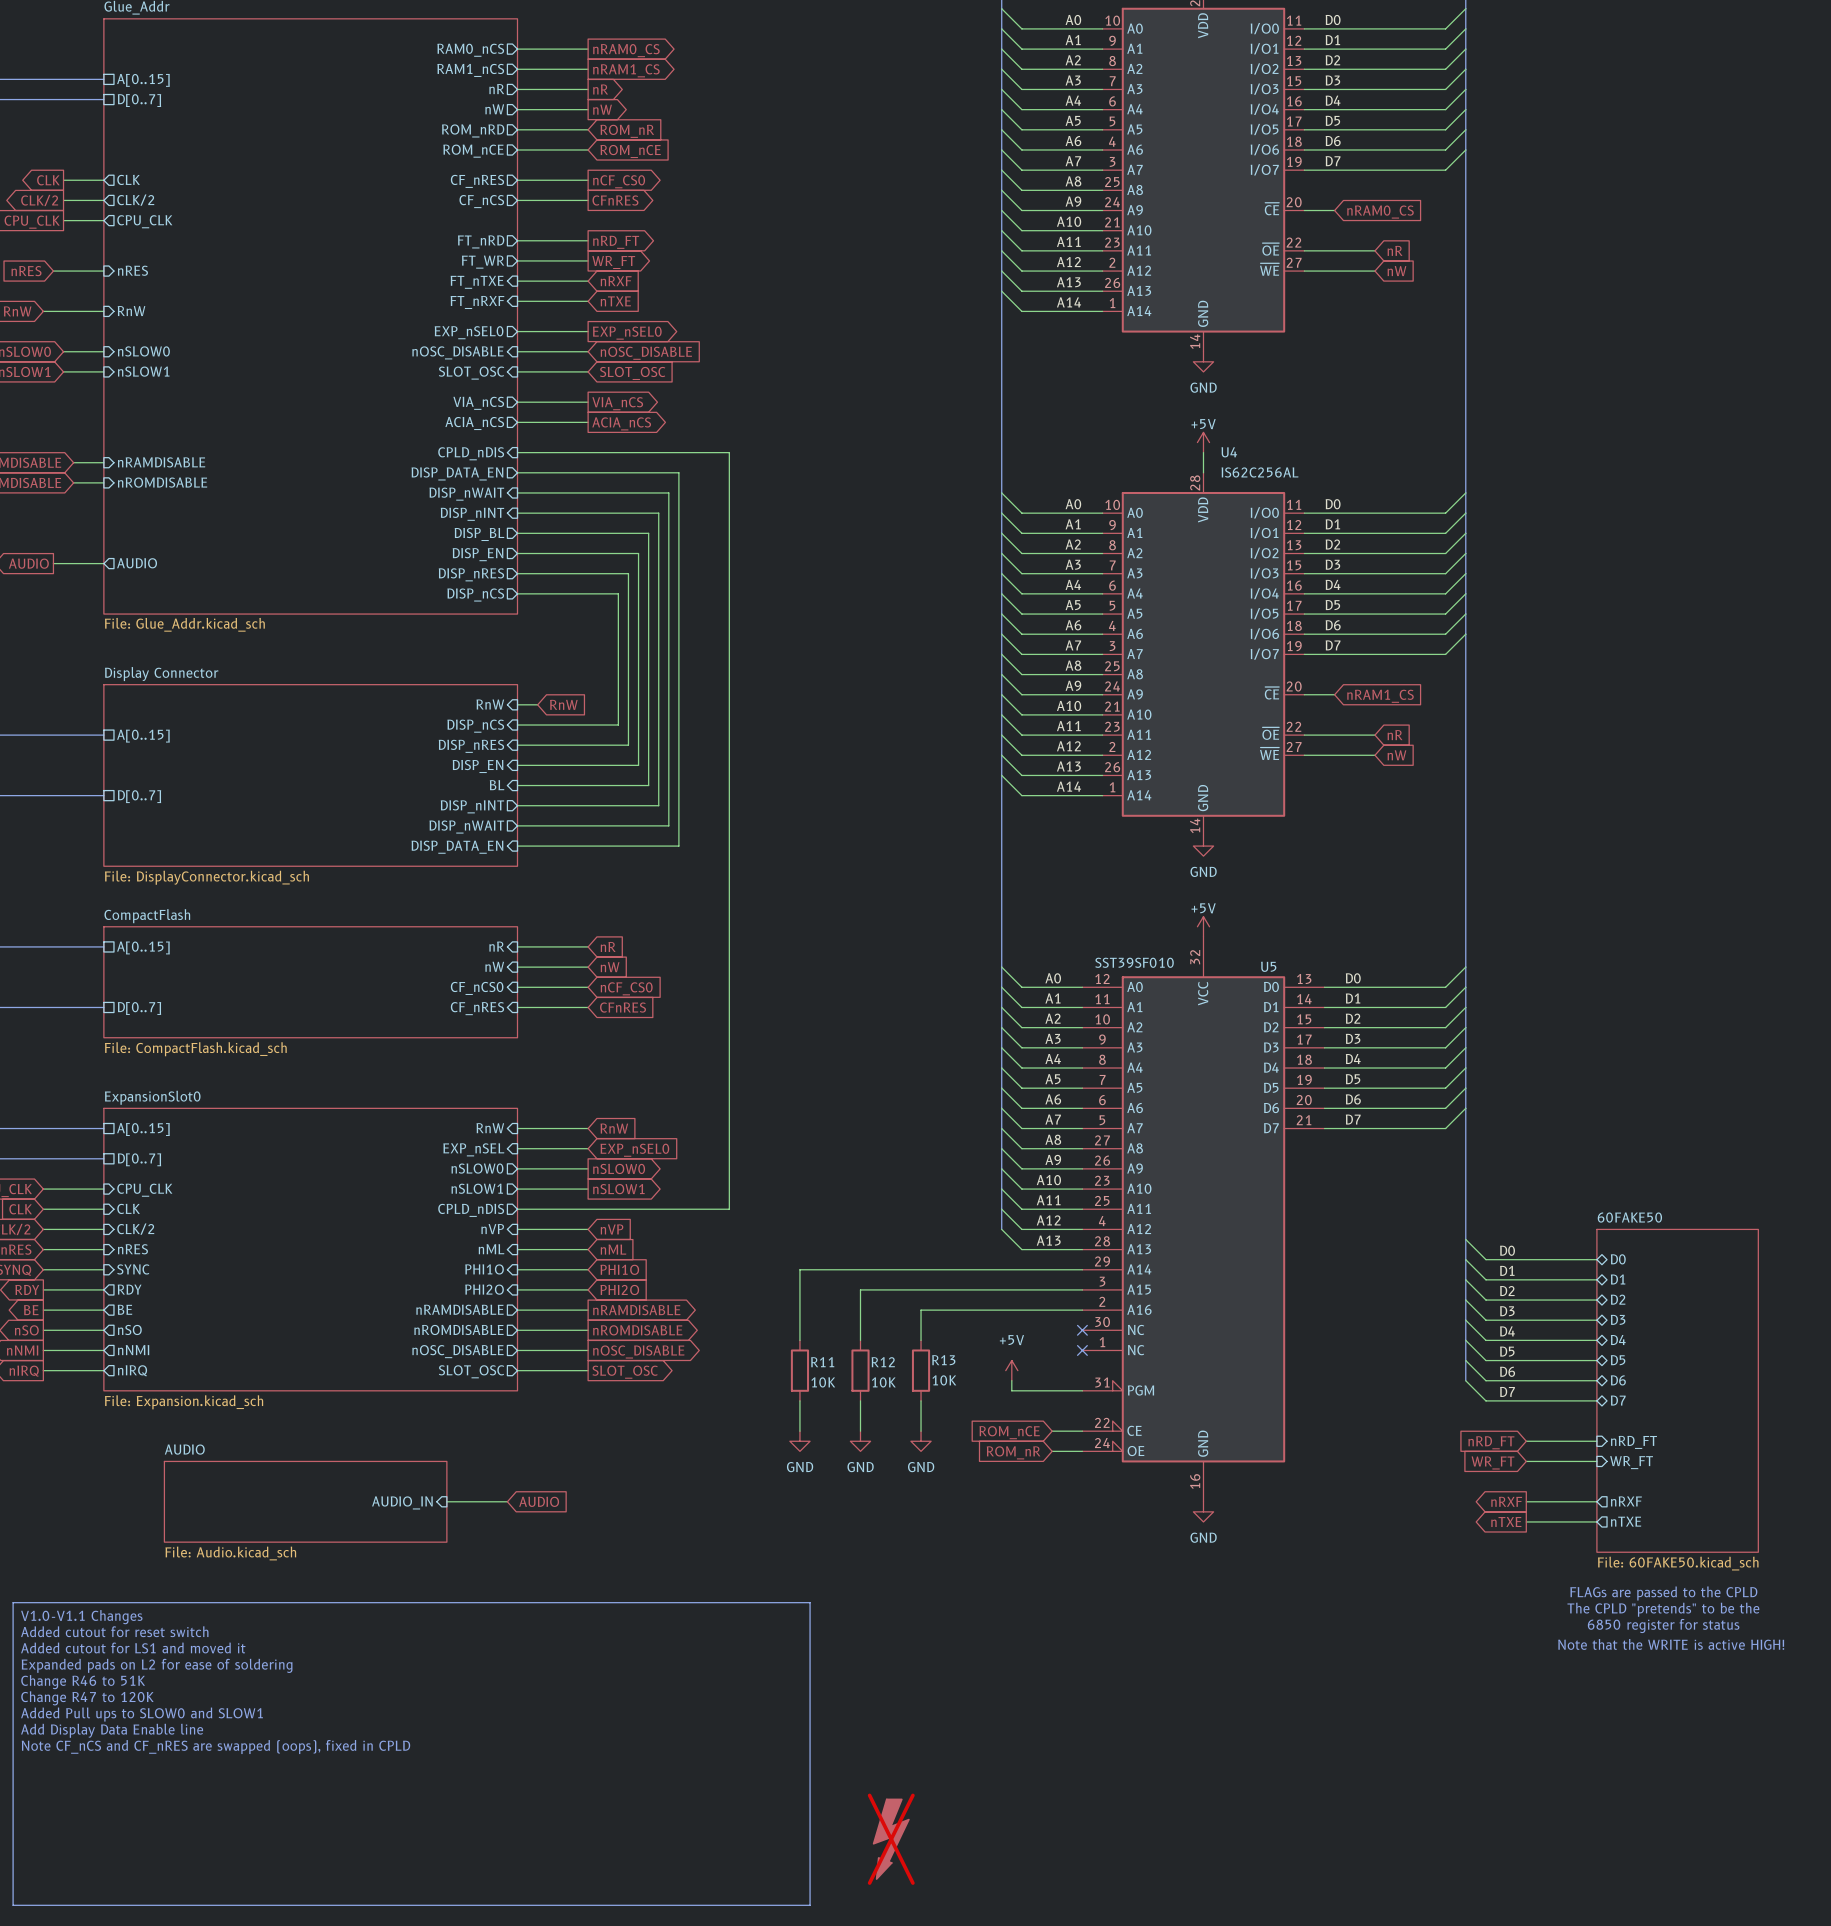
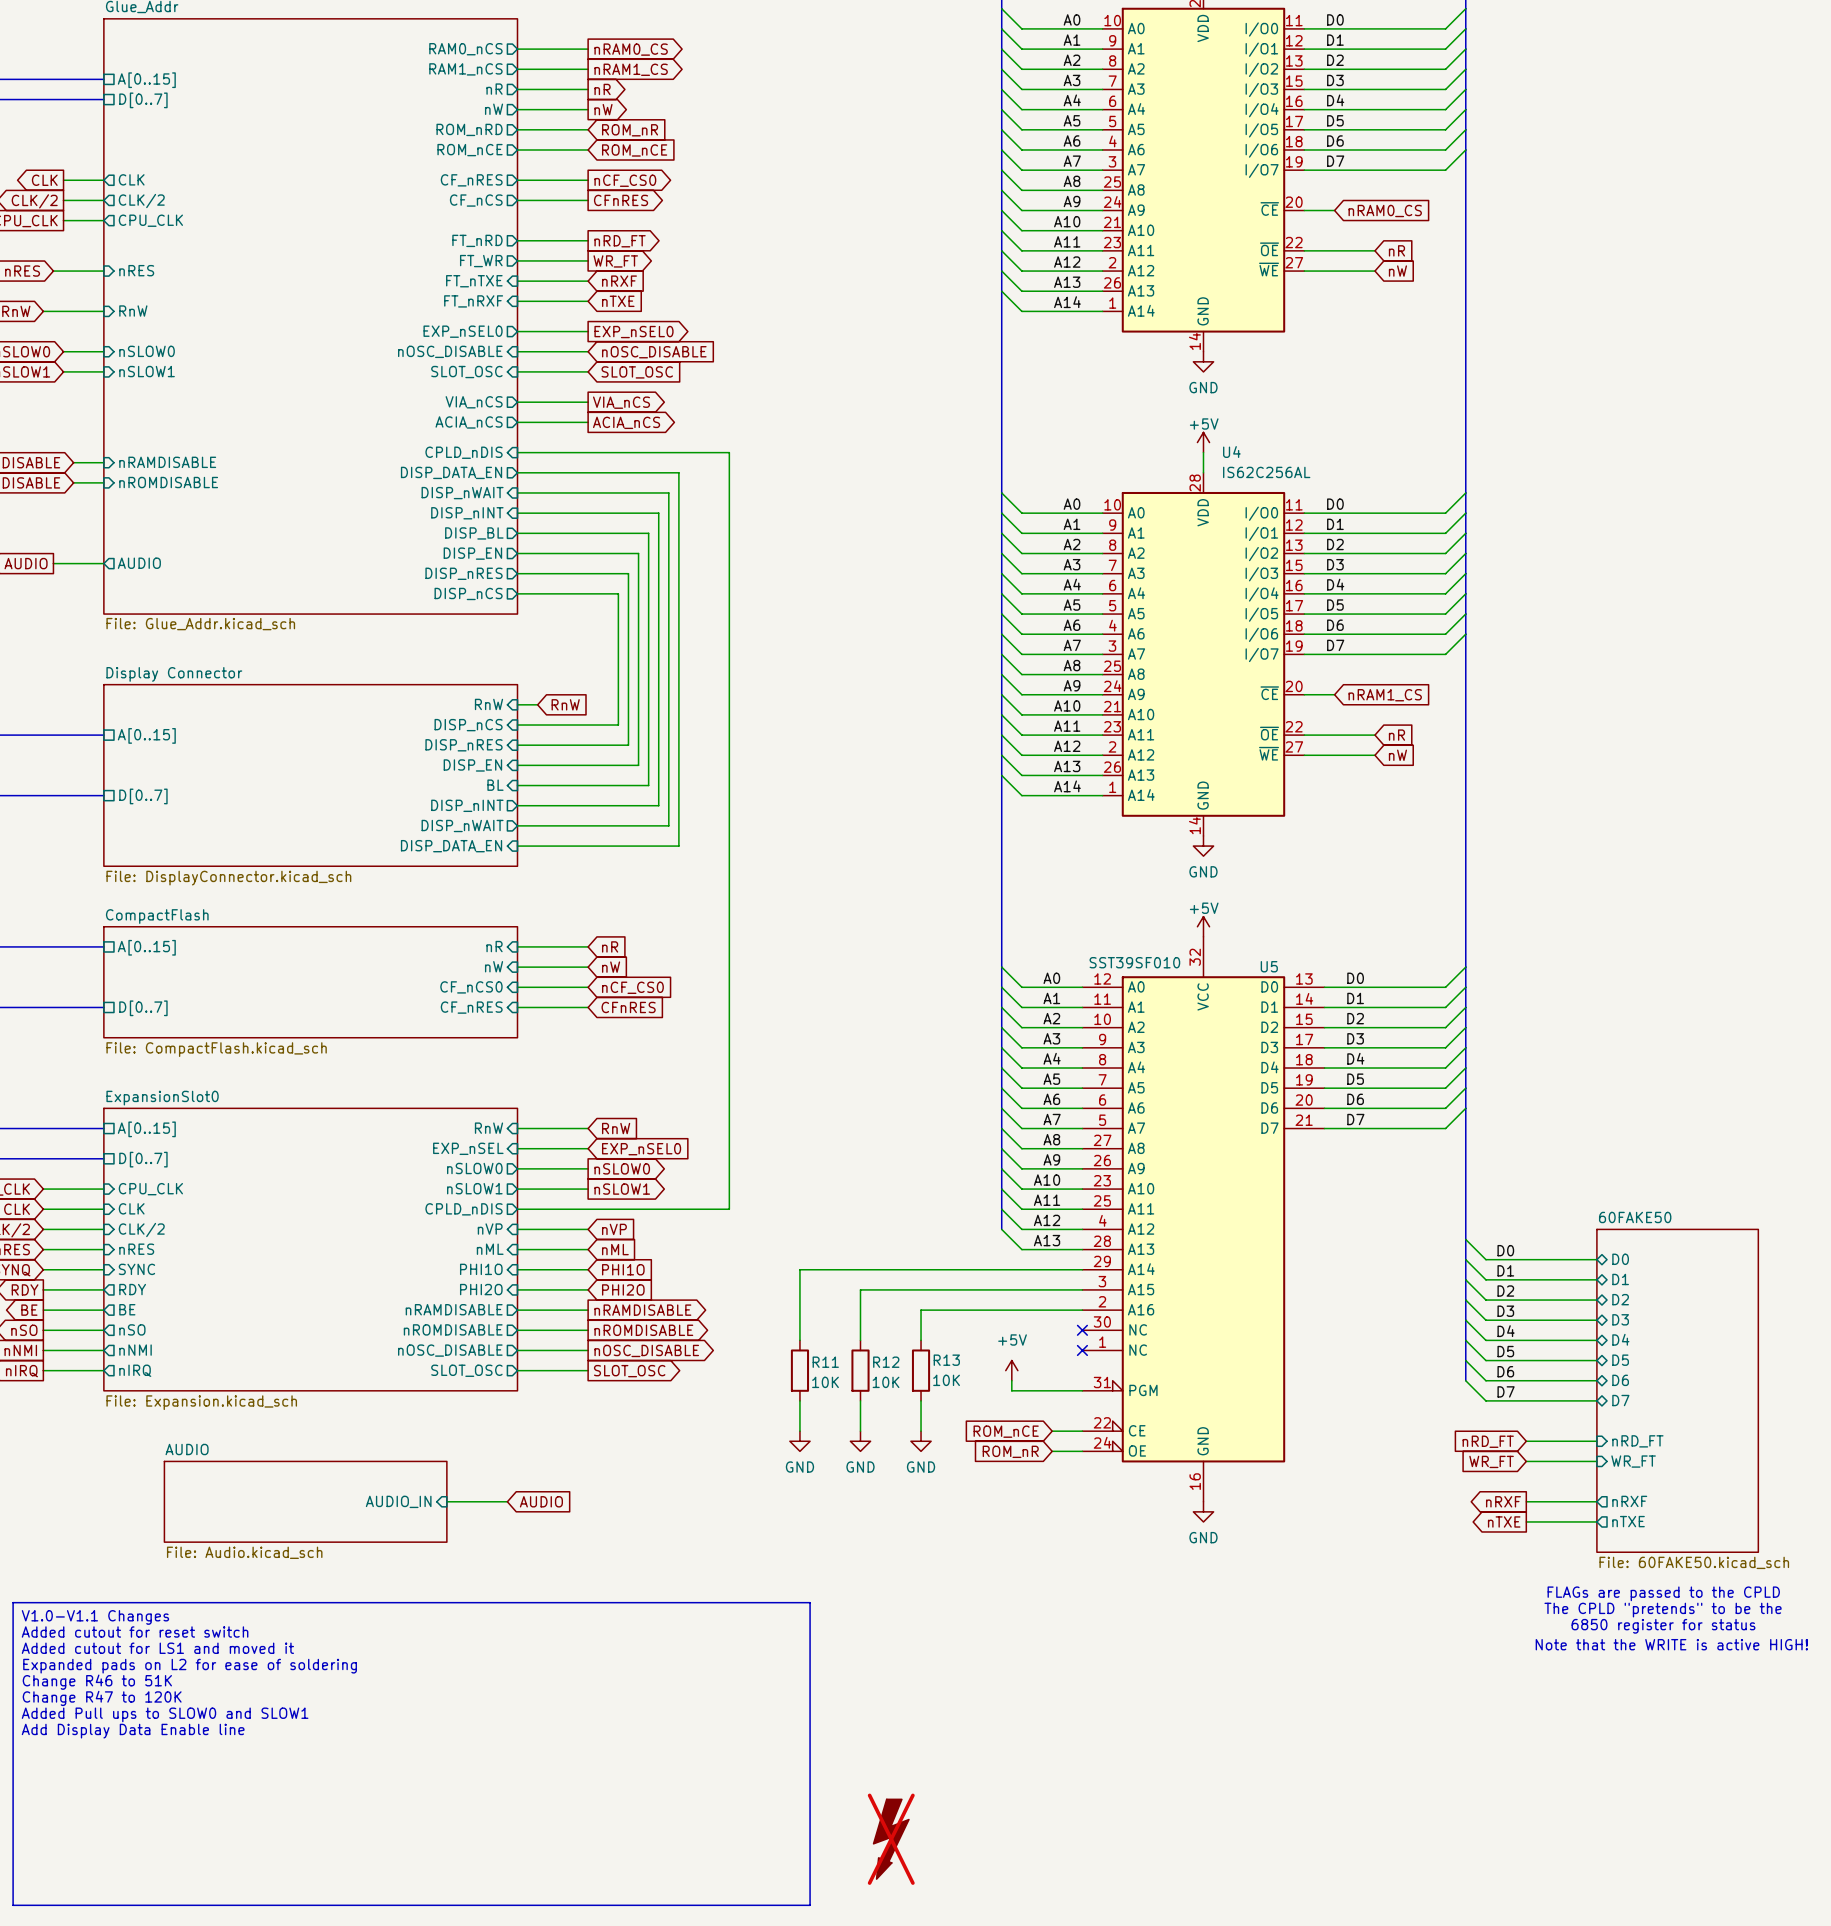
text: Note CF_nCS and CF_nRES are swapped (oops), fixed in CPLD (215, 1747) -> none

